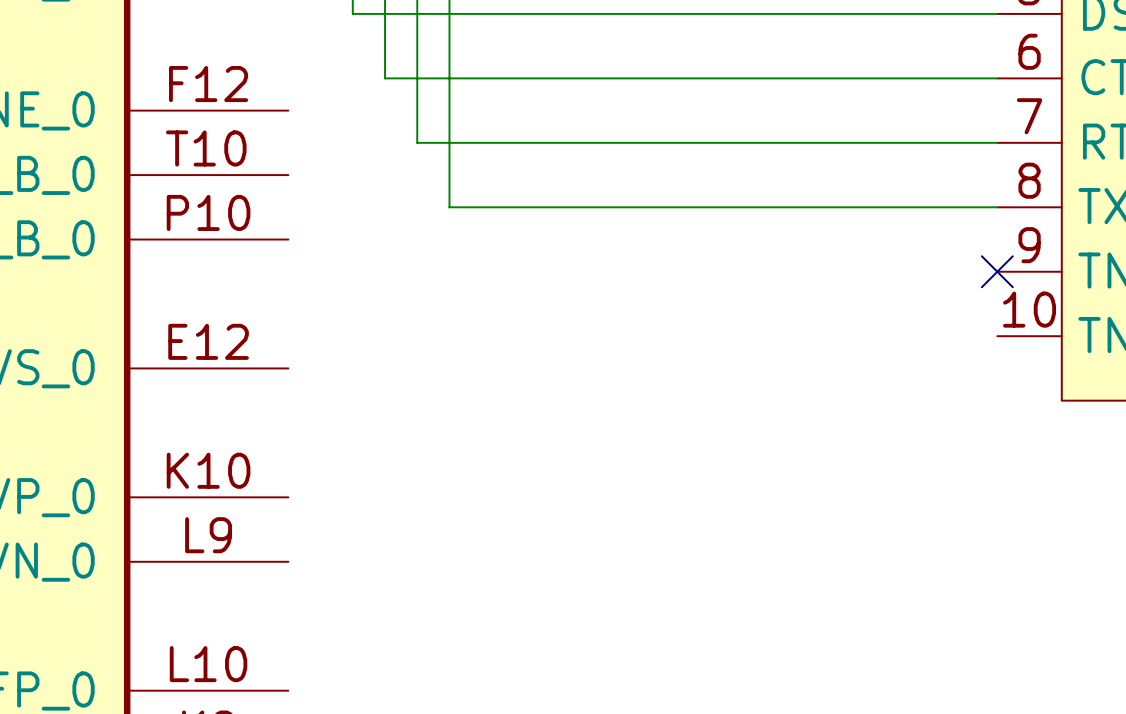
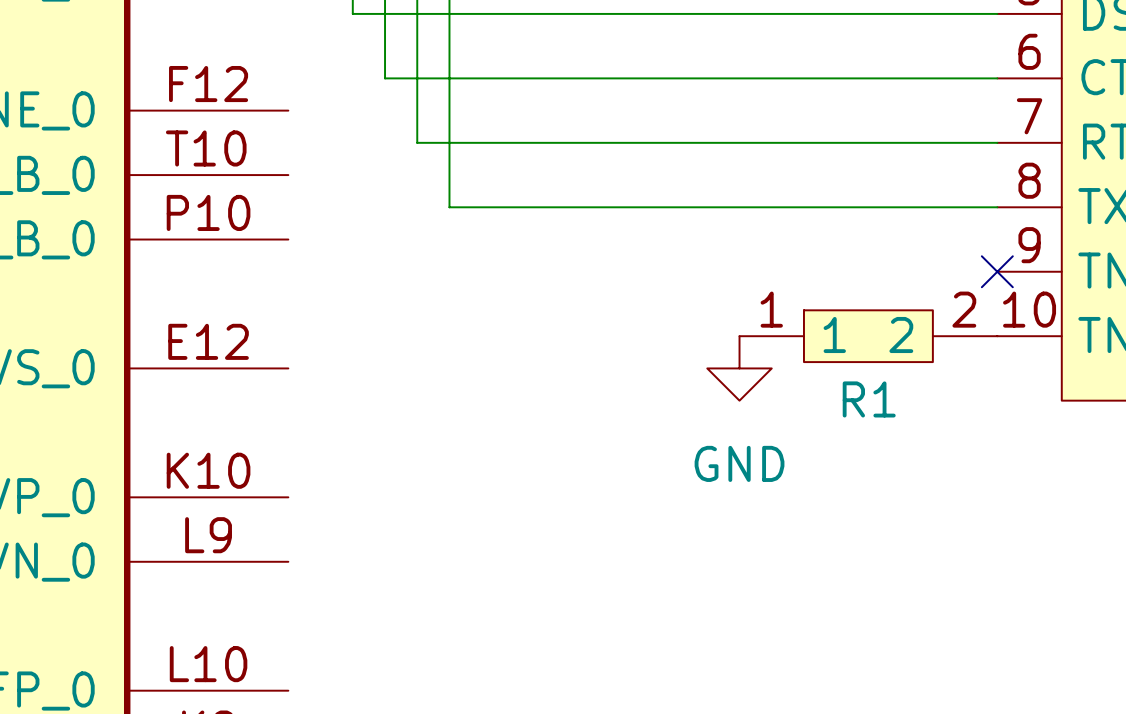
R1: none -> (868, 336)
power symbol: none -> GND (739, 368)

